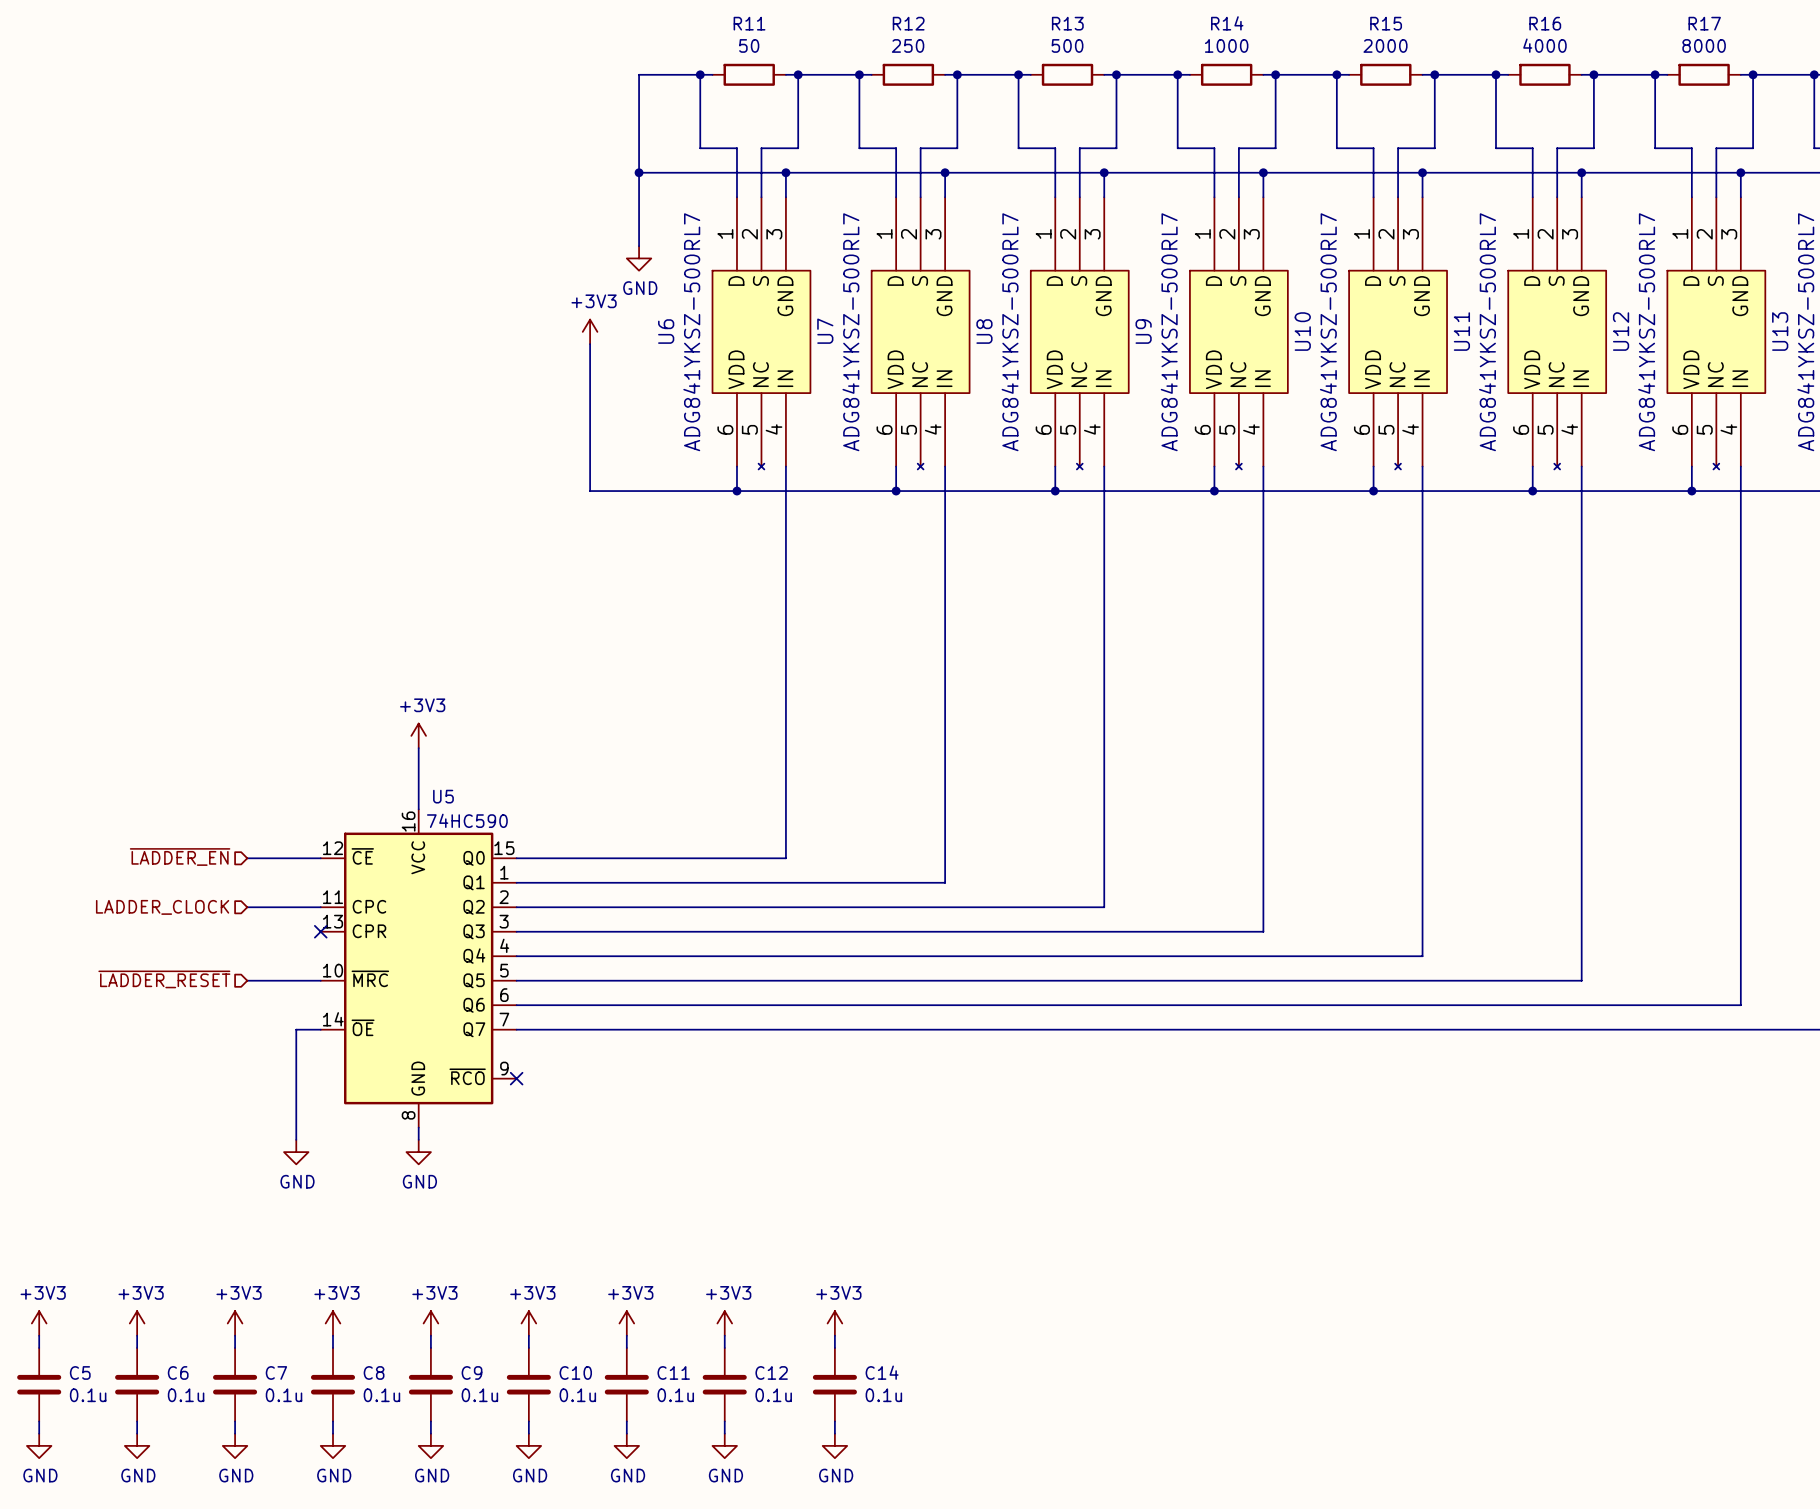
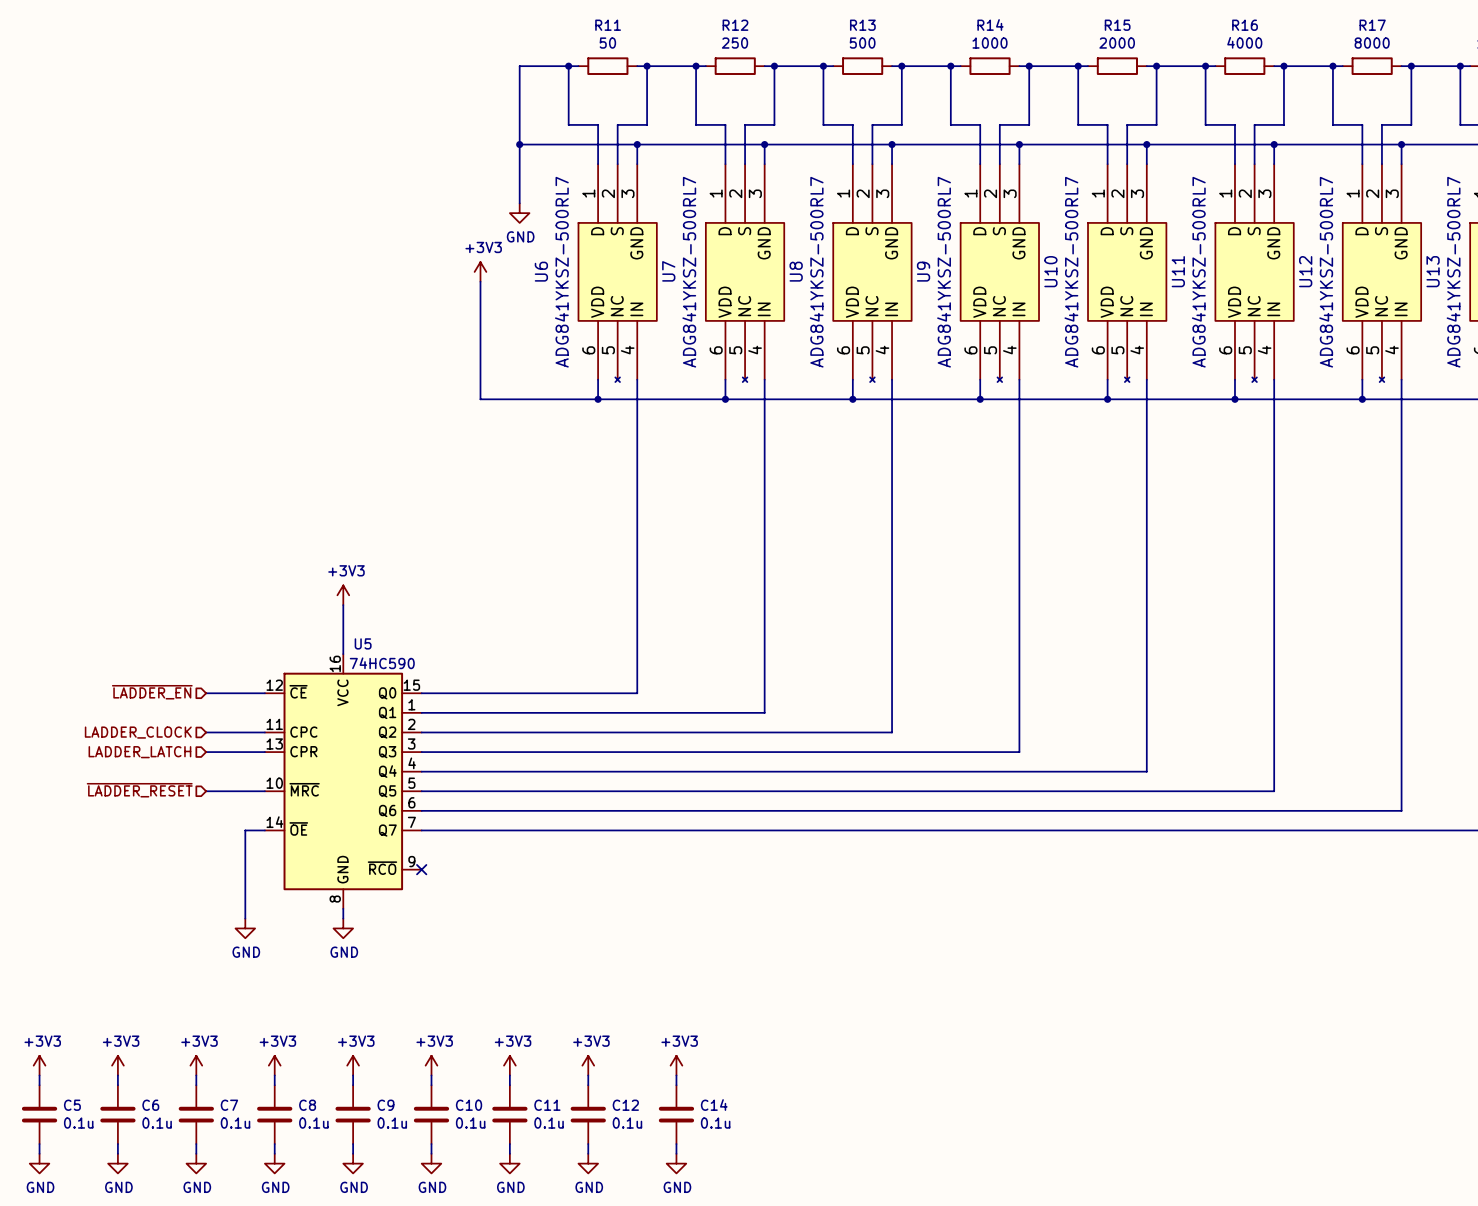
hierarchical label: none -> LADDER_LATCH (139, 752)
wire: none -> (206, 752) (264, 752)
no-connect mark: (320, 931) -> none

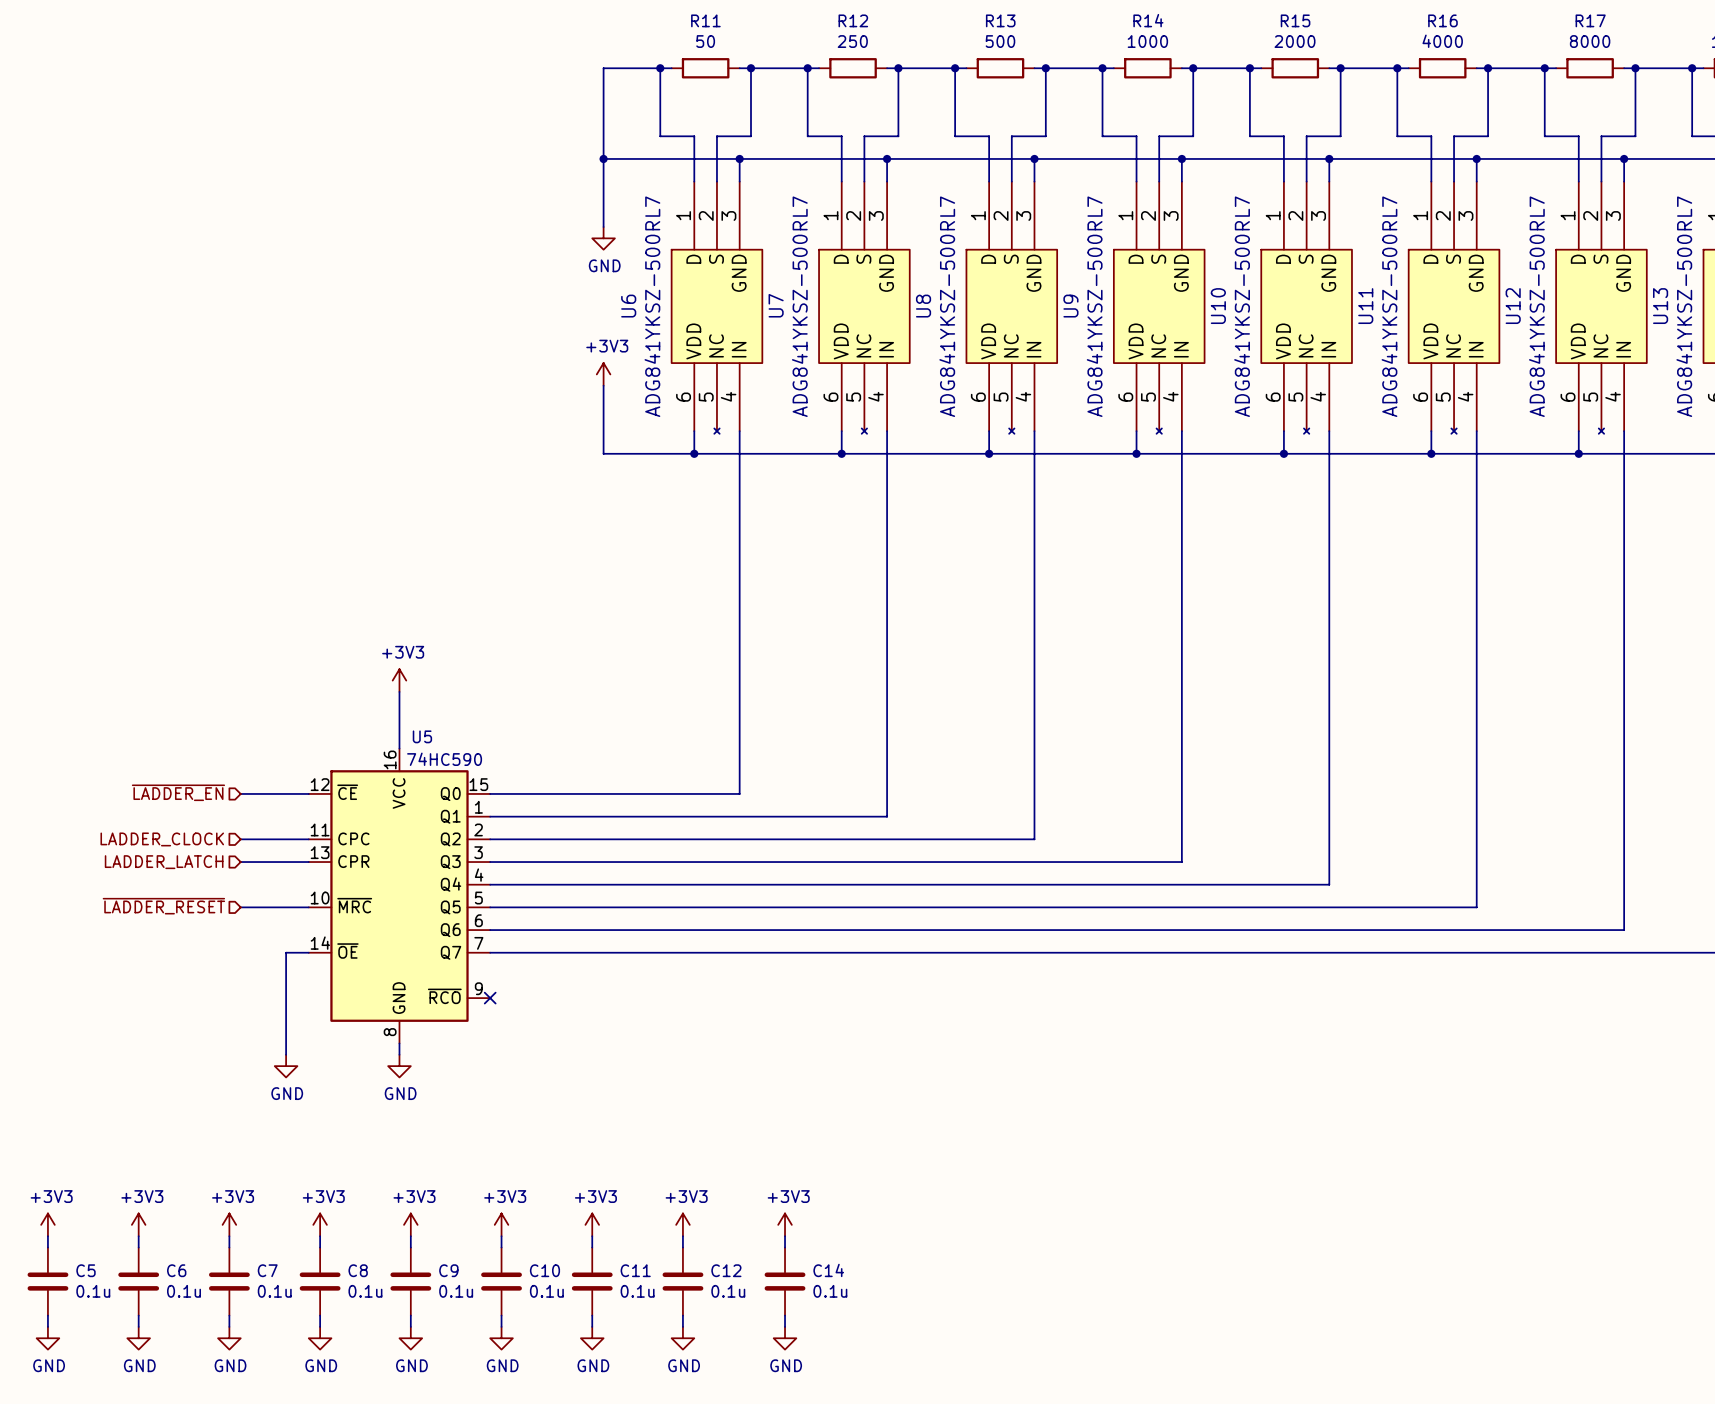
power symbol position: +3V3 (480, 271) -> +3V3 (603, 374)
wire: (480, 281) (480, 399) (519, 399) -> (603, 385) (603, 453)

